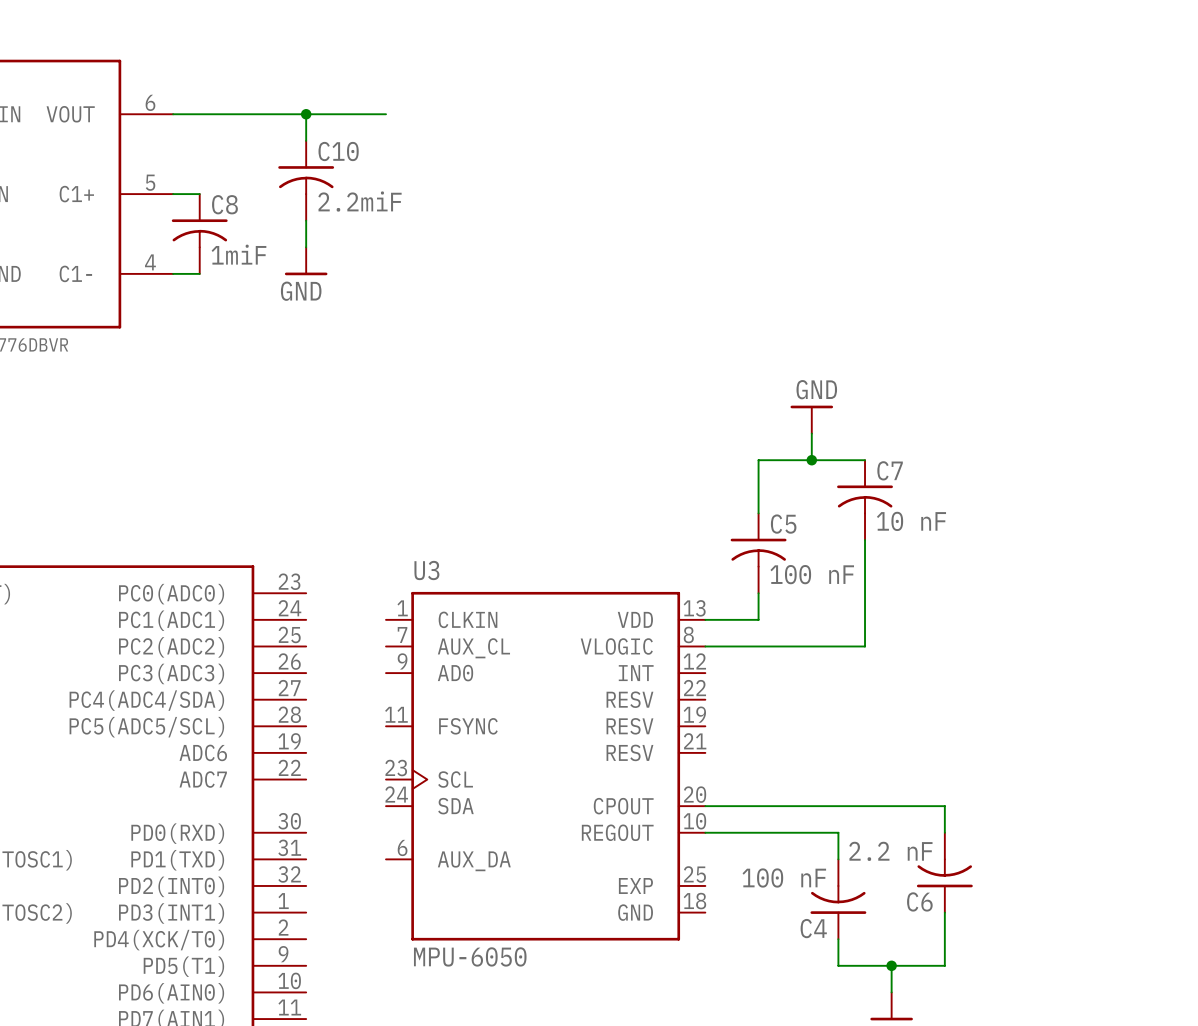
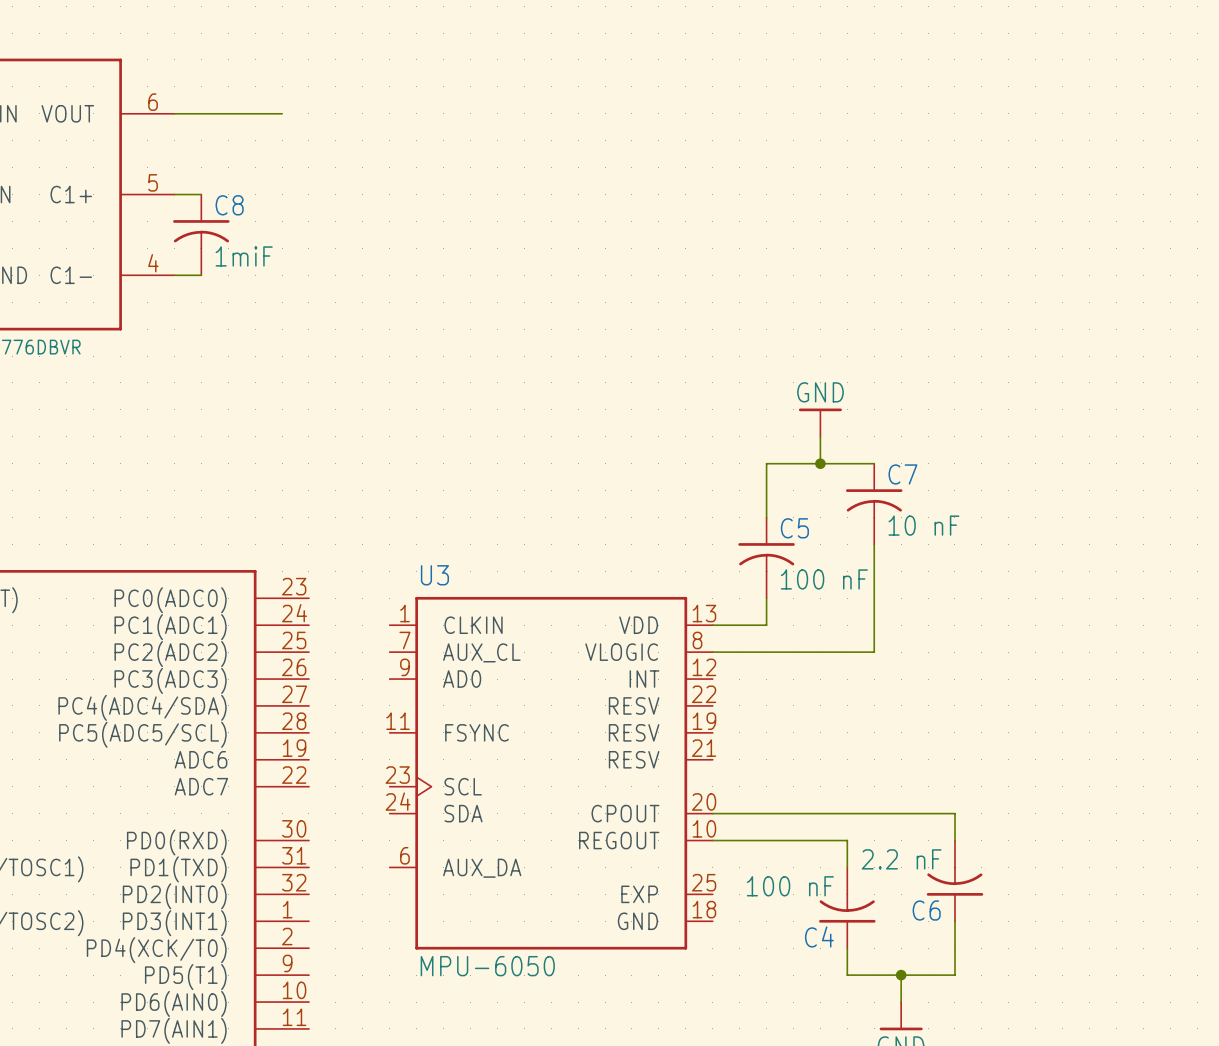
wire: (279, 114) (386, 114) -> none
wire: (306, 114) (306, 140) -> none
junction: (306, 114) -> none
C10: 2.2miF (306, 180) -> none
wire: (306, 220) (306, 247) -> none
power symbol: GND (306, 261) -> none

